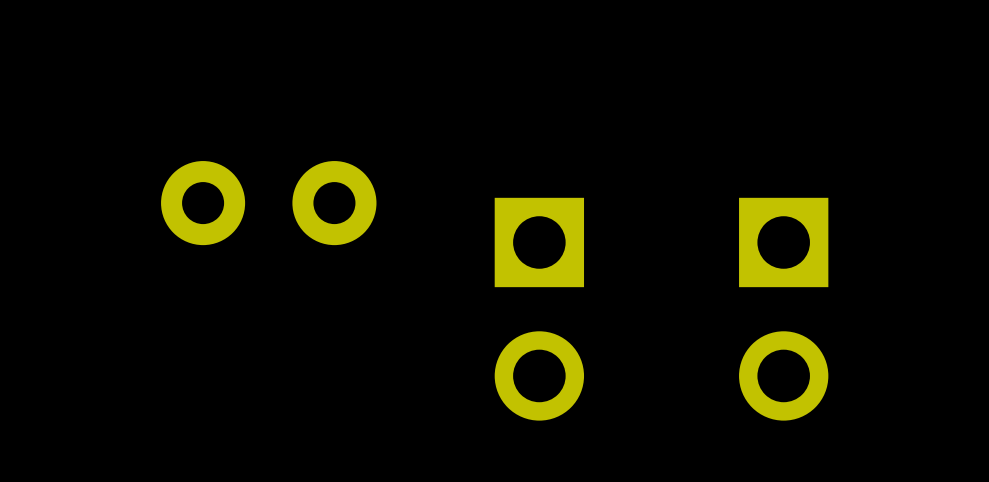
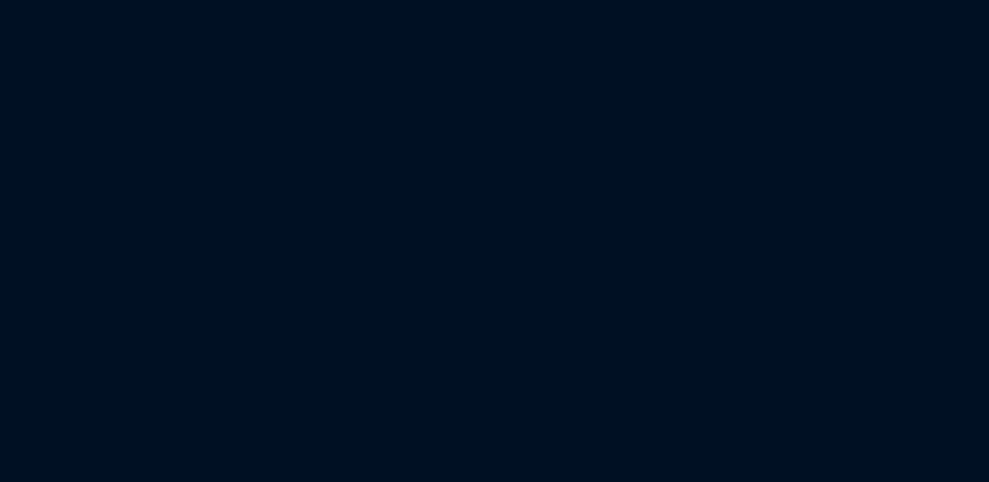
part: (268, 203) -> none
part: (539, 309) -> none
part: (783, 309) -> none

